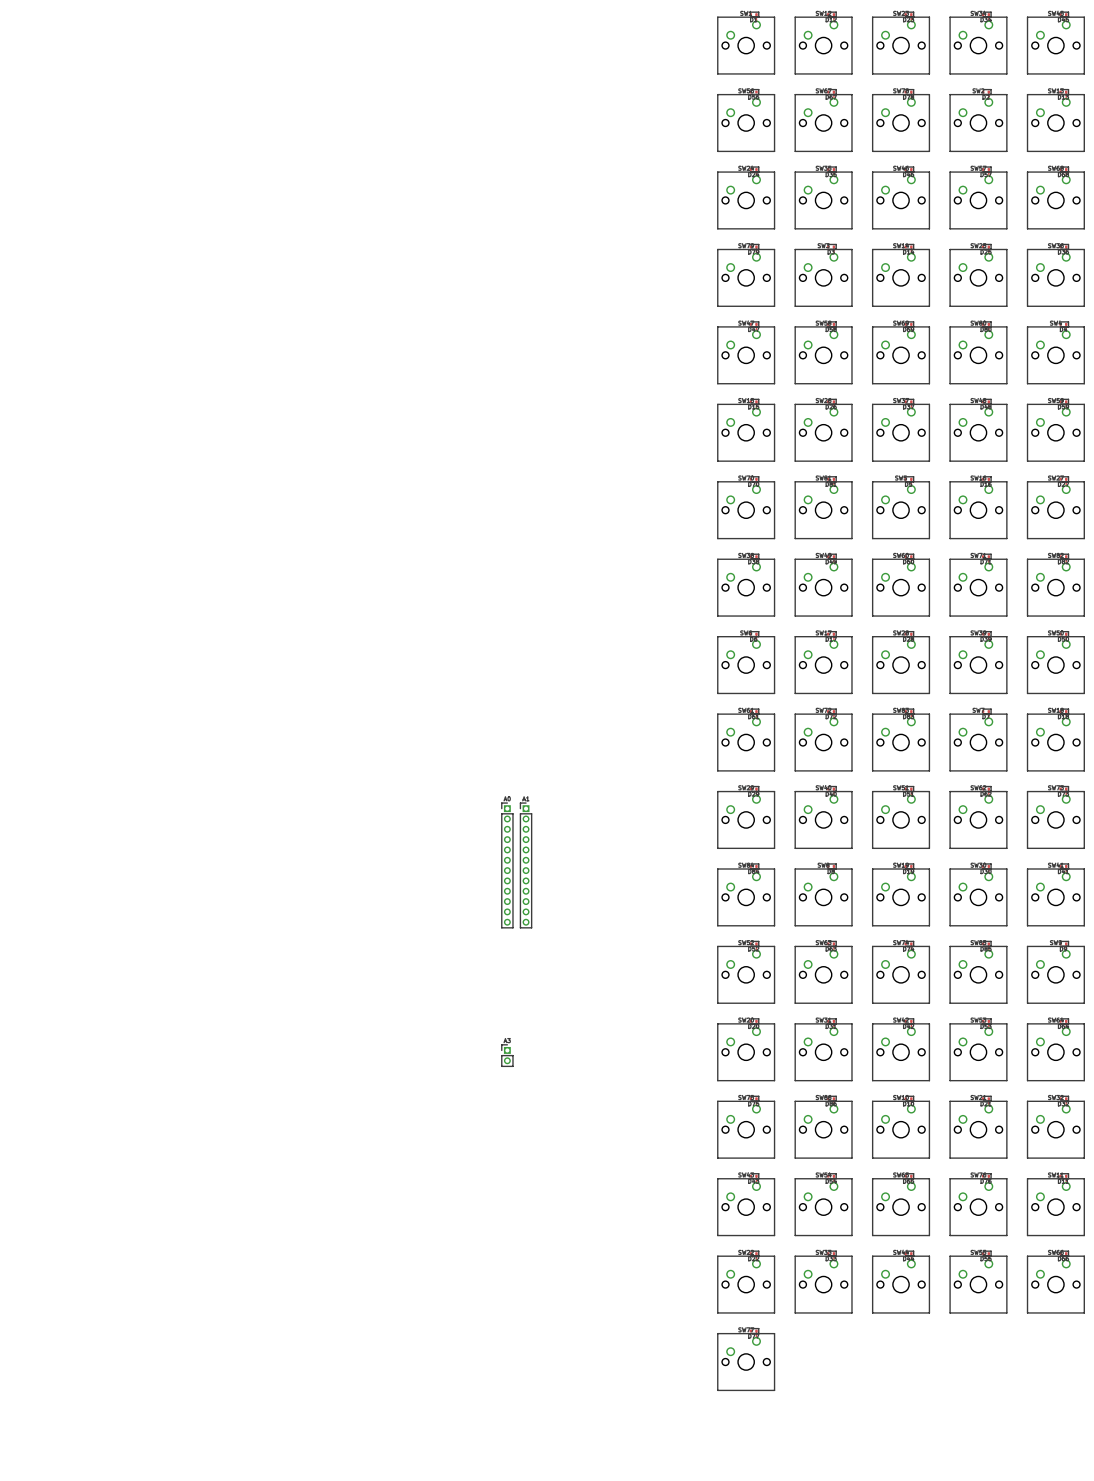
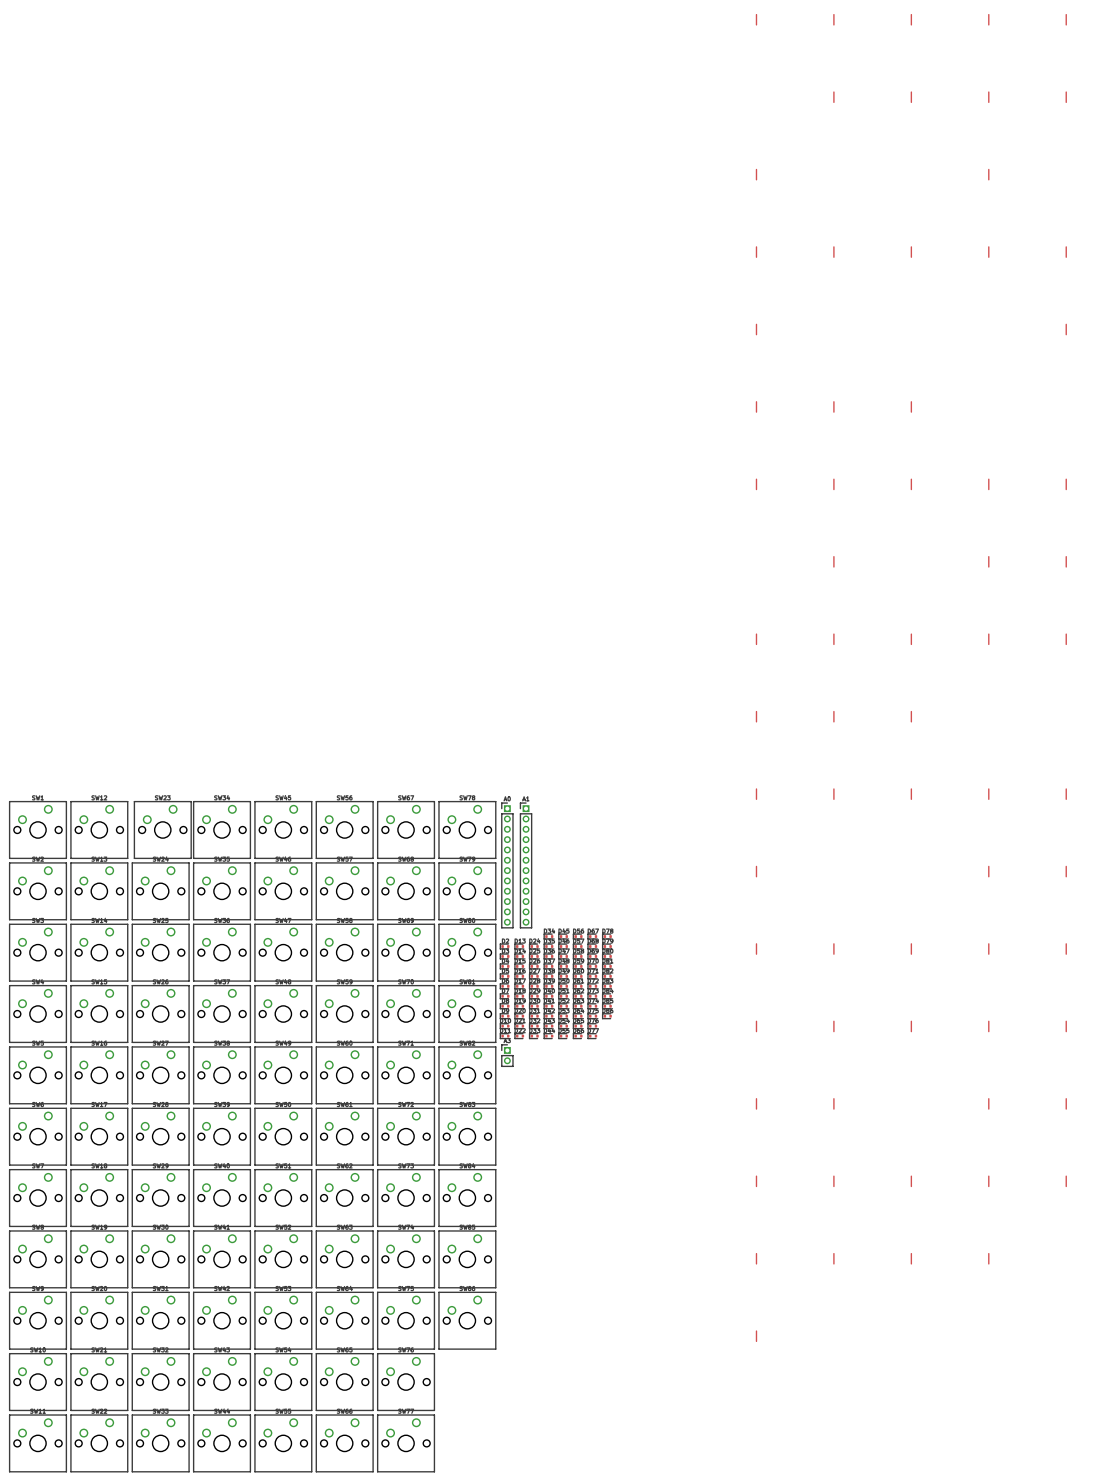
part: (754, 14) -> none
part: (831, 14) -> none
part: (909, 14) -> none
part rotation: 0° (986, 14) -> 180° (548, 936)
part position: (986, 14) -> (548, 936)
part rotation: 0° (1064, 14) -> 180° (563, 936)
part position: (1064, 14) -> (563, 936)
part position: (746, 45) -> (37, 829)
part position: (823, 45) -> (99, 829)
part position: (901, 45) -> (162, 829)
part position: (978, 45) -> (222, 829)
part position: (1055, 45) -> (283, 829)
part rotation: 0° (754, 92) -> 180° (577, 936)
part position: (754, 92) -> (577, 936)
part rotation: 0° (831, 92) -> 180° (592, 936)
part position: (831, 92) -> (592, 936)
part rotation: 0° (909, 92) -> 180° (607, 936)
part position: (909, 92) -> (607, 936)
part rotation: 0° (986, 92) -> 180° (504, 946)
part position: (986, 92) -> (504, 946)
part rotation: 0° (1064, 92) -> 180° (519, 946)
part position: (1064, 92) -> (519, 946)
part position: (746, 123) -> (344, 829)
part position: (823, 123) -> (406, 829)
part position: (901, 123) -> (467, 829)
part position: (978, 123) -> (37, 891)
part position: (1055, 123) -> (99, 891)
part rotation: 0° (754, 169) -> 180° (534, 946)
part position: (754, 169) -> (534, 946)
part rotation: 0° (831, 169) -> 180° (548, 946)
part position: (831, 169) -> (548, 946)
part rotation: 0° (909, 169) -> 180° (563, 946)
part position: (909, 169) -> (563, 946)
part rotation: 0° (986, 169) -> 180° (577, 946)
part position: (986, 169) -> (577, 946)
part rotation: 0° (1064, 169) -> 180° (592, 946)
part position: (1064, 169) -> (592, 946)
part position: (746, 200) -> (160, 891)
part position: (823, 200) -> (222, 891)
part position: (901, 200) -> (283, 891)
part position: (978, 200) -> (344, 891)
part position: (1055, 200) -> (406, 891)
part rotation: 0° (754, 246) -> 180° (607, 946)
part position: (754, 246) -> (607, 946)
part rotation: 0° (831, 246) -> 180° (504, 956)
part position: (831, 246) -> (504, 956)
part rotation: 0° (909, 246) -> 180° (519, 956)
part position: (909, 246) -> (519, 956)
part rotation: 0° (986, 246) -> 180° (534, 956)
part position: (986, 246) -> (534, 956)
part rotation: 0° (1064, 246) -> 180° (548, 956)
part position: (1064, 246) -> (548, 956)
part position: (746, 277) -> (467, 891)
part position: (823, 277) -> (37, 952)
part position: (901, 277) -> (99, 952)
part position: (978, 277) -> (160, 952)
part position: (1055, 277) -> (222, 952)
part rotation: 0° (754, 324) -> 180° (563, 956)
part position: (754, 324) -> (563, 956)
part rotation: 0° (831, 324) -> 180° (577, 956)
part position: (831, 324) -> (577, 956)
part rotation: 0° (909, 324) -> 180° (592, 956)
part position: (909, 324) -> (592, 956)
part rotation: 0° (986, 324) -> 180° (607, 956)
part position: (986, 324) -> (607, 956)
part rotation: 0° (1064, 324) -> 180° (504, 966)
part position: (1064, 324) -> (504, 966)
part position: (746, 355) -> (283, 952)
part position: (823, 355) -> (344, 952)
part position: (901, 355) -> (406, 952)
part position: (978, 355) -> (467, 952)
part position: (1055, 355) -> (37, 1014)
part rotation: 0° (754, 401) -> 180° (519, 966)
part position: (754, 401) -> (519, 966)
part rotation: 0° (831, 401) -> 180° (534, 966)
part position: (831, 401) -> (534, 966)
part rotation: 0° (909, 401) -> 180° (548, 966)
part position: (909, 401) -> (548, 966)
part rotation: 0° (986, 401) -> 180° (563, 966)
part position: (986, 401) -> (563, 966)
part rotation: 0° (1064, 401) -> 180° (577, 966)
part position: (1064, 401) -> (577, 966)
part position: (746, 432) -> (99, 1014)
part position: (823, 432) -> (160, 1014)
part position: (901, 432) -> (222, 1014)
part position: (978, 432) -> (283, 1014)
part position: (1055, 432) -> (344, 1014)
part rotation: 0° (754, 479) -> 180° (592, 966)
part position: (754, 479) -> (592, 966)
part rotation: 0° (831, 479) -> 180° (607, 966)
part position: (831, 479) -> (607, 966)
part rotation: 0° (909, 479) -> 180° (504, 976)
part position: (909, 479) -> (504, 976)
part rotation: 0° (986, 479) -> 180° (519, 976)
part position: (986, 479) -> (519, 976)
part rotation: 0° (1064, 479) -> 180° (534, 976)
part position: (1064, 479) -> (534, 976)
part position: (746, 510) -> (406, 1014)
part position: (823, 510) -> (467, 1014)
part position: (901, 510) -> (37, 1075)
part position: (978, 510) -> (99, 1075)
part position: (1055, 510) -> (160, 1075)
part rotation: 0° (754, 556) -> 180° (548, 976)
part position: (754, 556) -> (548, 976)
part rotation: 0° (831, 556) -> 180° (563, 976)
part position: (831, 556) -> (563, 976)
part rotation: 0° (909, 556) -> 180° (577, 976)
part position: (909, 556) -> (577, 976)
part rotation: 0° (986, 556) -> 180° (592, 976)
part position: (986, 556) -> (592, 976)
part rotation: 0° (1064, 556) -> 180° (607, 976)
part position: (1064, 556) -> (607, 976)
part position: (746, 587) -> (222, 1075)
part position: (823, 587) -> (283, 1075)
part position: (901, 587) -> (344, 1075)
part position: (978, 587) -> (406, 1075)
part position: (1055, 587) -> (467, 1075)
part rotation: 0° (754, 634) -> 180° (504, 986)
part position: (754, 634) -> (504, 986)
part rotation: 0° (831, 634) -> 180° (519, 986)
part position: (831, 634) -> (519, 986)
part rotation: 0° (909, 634) -> 180° (534, 986)
part position: (909, 634) -> (534, 986)
part rotation: 0° (986, 634) -> 180° (548, 986)
part position: (986, 634) -> (548, 986)
part rotation: 0° (1064, 634) -> 180° (563, 986)
part position: (1064, 634) -> (563, 986)
part position: (746, 665) -> (37, 1136)
part position: (823, 665) -> (99, 1136)
part position: (901, 665) -> (160, 1136)
part position: (978, 665) -> (222, 1136)
part position: (1055, 665) -> (283, 1136)
part rotation: 0° (754, 711) -> 180° (577, 986)
part position: (754, 711) -> (577, 986)
part rotation: 0° (831, 711) -> 180° (592, 986)
part position: (831, 711) -> (592, 986)
part rotation: 0° (909, 711) -> 180° (607, 986)
part position: (909, 711) -> (607, 986)
part rotation: 0° (986, 711) -> 180° (504, 996)
part position: (986, 711) -> (504, 996)
part rotation: 0° (1064, 711) -> 180° (519, 996)
part position: (1064, 711) -> (519, 996)
part position: (746, 742) -> (344, 1136)
part position: (823, 742) -> (406, 1136)
part position: (901, 742) -> (467, 1136)
part position: (978, 742) -> (37, 1198)
part position: (1055, 742) -> (99, 1198)
part rotation: 0° (754, 788) -> 180° (534, 996)
part position: (754, 788) -> (534, 996)
part rotation: 0° (831, 788) -> 180° (548, 996)
part position: (831, 788) -> (548, 996)
part rotation: 0° (909, 788) -> 180° (563, 996)
part position: (909, 788) -> (563, 996)
part rotation: 0° (986, 788) -> 180° (577, 996)
part position: (986, 788) -> (577, 996)
part rotation: 0° (1064, 788) -> 180° (592, 996)
part position: (1064, 788) -> (592, 996)
part position: (746, 819) -> (160, 1198)
part position: (823, 819) -> (222, 1198)
part position: (901, 819) -> (283, 1198)
part position: (978, 819) -> (344, 1198)
part position: (1055, 819) -> (406, 1198)
part rotation: 0° (754, 866) -> 180° (607, 996)
part position: (754, 866) -> (607, 996)
part rotation: 0° (831, 866) -> 180° (504, 1006)
part position: (831, 866) -> (504, 1006)
part rotation: 0° (909, 866) -> 180° (519, 1006)
part position: (909, 866) -> (519, 1006)
part rotation: 0° (986, 866) -> 180° (534, 1006)
part position: (986, 866) -> (534, 1006)
part rotation: 0° (1064, 866) -> 180° (548, 1006)
part position: (1064, 866) -> (548, 1006)
part position: (746, 897) -> (467, 1198)
part position: (823, 897) -> (37, 1259)
part position: (901, 897) -> (99, 1259)
part position: (978, 897) -> (160, 1259)
part position: (1055, 897) -> (222, 1259)
part rotation: 0° (754, 943) -> 180° (563, 1006)
part position: (754, 943) -> (563, 1006)
part rotation: 0° (831, 943) -> 180° (577, 1006)
part position: (831, 943) -> (577, 1006)
part rotation: 0° (909, 943) -> 180° (592, 1006)
part position: (909, 943) -> (592, 1006)
part rotation: 0° (986, 943) -> 180° (607, 1006)
part position: (986, 943) -> (607, 1006)
part rotation: 0° (1064, 943) -> 180° (504, 1016)
part position: (1064, 943) -> (504, 1016)
part position: (746, 974) -> (283, 1259)
part position: (823, 974) -> (344, 1259)
part position: (901, 974) -> (406, 1259)
part position: (978, 974) -> (467, 1259)
part position: (1055, 974) -> (37, 1320)
part rotation: 0° (754, 1021) -> 180° (519, 1016)
part position: (754, 1021) -> (519, 1016)
part rotation: 0° (831, 1021) -> 180° (534, 1016)
part position: (831, 1021) -> (534, 1016)
part rotation: 0° (909, 1021) -> 180° (548, 1016)
part position: (909, 1021) -> (548, 1016)
part rotation: 0° (986, 1021) -> 180° (563, 1016)
part position: (986, 1021) -> (563, 1016)
part rotation: 0° (1064, 1021) -> 180° (577, 1016)
part position: (1064, 1021) -> (577, 1016)
part position: (746, 1052) -> (99, 1320)
part position: (823, 1052) -> (160, 1320)
part position: (901, 1052) -> (222, 1320)
part position: (978, 1052) -> (283, 1320)
part position: (1055, 1052) -> (344, 1320)
part rotation: 0° (754, 1098) -> 180° (592, 1016)
part position: (754, 1098) -> (592, 1016)
part rotation: 0° (831, 1098) -> 180° (607, 1016)
part position: (831, 1098) -> (607, 1016)
part rotation: 0° (909, 1098) -> 180° (504, 1026)
part position: (909, 1098) -> (504, 1026)
part rotation: 0° (986, 1098) -> 180° (519, 1026)
part position: (986, 1098) -> (519, 1026)
part rotation: 0° (1064, 1098) -> 180° (534, 1026)
part position: (1064, 1098) -> (534, 1026)
part position: (746, 1129) -> (406, 1320)
part position: (823, 1129) -> (467, 1320)
part position: (901, 1129) -> (37, 1382)
part position: (978, 1129) -> (99, 1382)
part position: (1055, 1129) -> (160, 1382)
part rotation: 0° (754, 1176) -> 180° (548, 1026)
part position: (754, 1176) -> (548, 1026)
part rotation: 0° (831, 1176) -> 180° (563, 1026)
part position: (831, 1176) -> (563, 1026)
part rotation: 0° (909, 1176) -> 180° (577, 1026)
part position: (909, 1176) -> (577, 1026)
part rotation: 0° (986, 1176) -> 180° (592, 1026)
part position: (986, 1176) -> (592, 1026)
part rotation: 0° (1064, 1176) -> 180° (504, 1036)
part position: (1064, 1176) -> (504, 1036)
part position: (746, 1207) -> (222, 1382)
part position: (823, 1207) -> (283, 1382)
part position: (901, 1207) -> (344, 1382)
part position: (978, 1207) -> (406, 1382)
part position: (1055, 1207) -> (37, 1443)
part rotation: 0° (754, 1253) -> 180° (519, 1036)
part position: (754, 1253) -> (519, 1036)
part rotation: 0° (831, 1253) -> 180° (534, 1036)
part position: (831, 1253) -> (534, 1036)
part rotation: 0° (909, 1253) -> 180° (548, 1036)
part position: (909, 1253) -> (548, 1036)
part rotation: 0° (986, 1253) -> 180° (563, 1036)
part position: (986, 1253) -> (563, 1036)
part rotation: 0° (1064, 1253) -> 180° (577, 1036)
part position: (1064, 1253) -> (577, 1036)
part position: (746, 1284) -> (99, 1443)
part position: (823, 1284) -> (160, 1443)
part position: (901, 1284) -> (222, 1443)
part position: (978, 1284) -> (283, 1443)
part position: (1055, 1284) -> (344, 1443)
part rotation: 0° (754, 1331) -> 180° (592, 1036)
part position: (754, 1331) -> (592, 1036)
part position: (746, 1362) -> (406, 1443)

